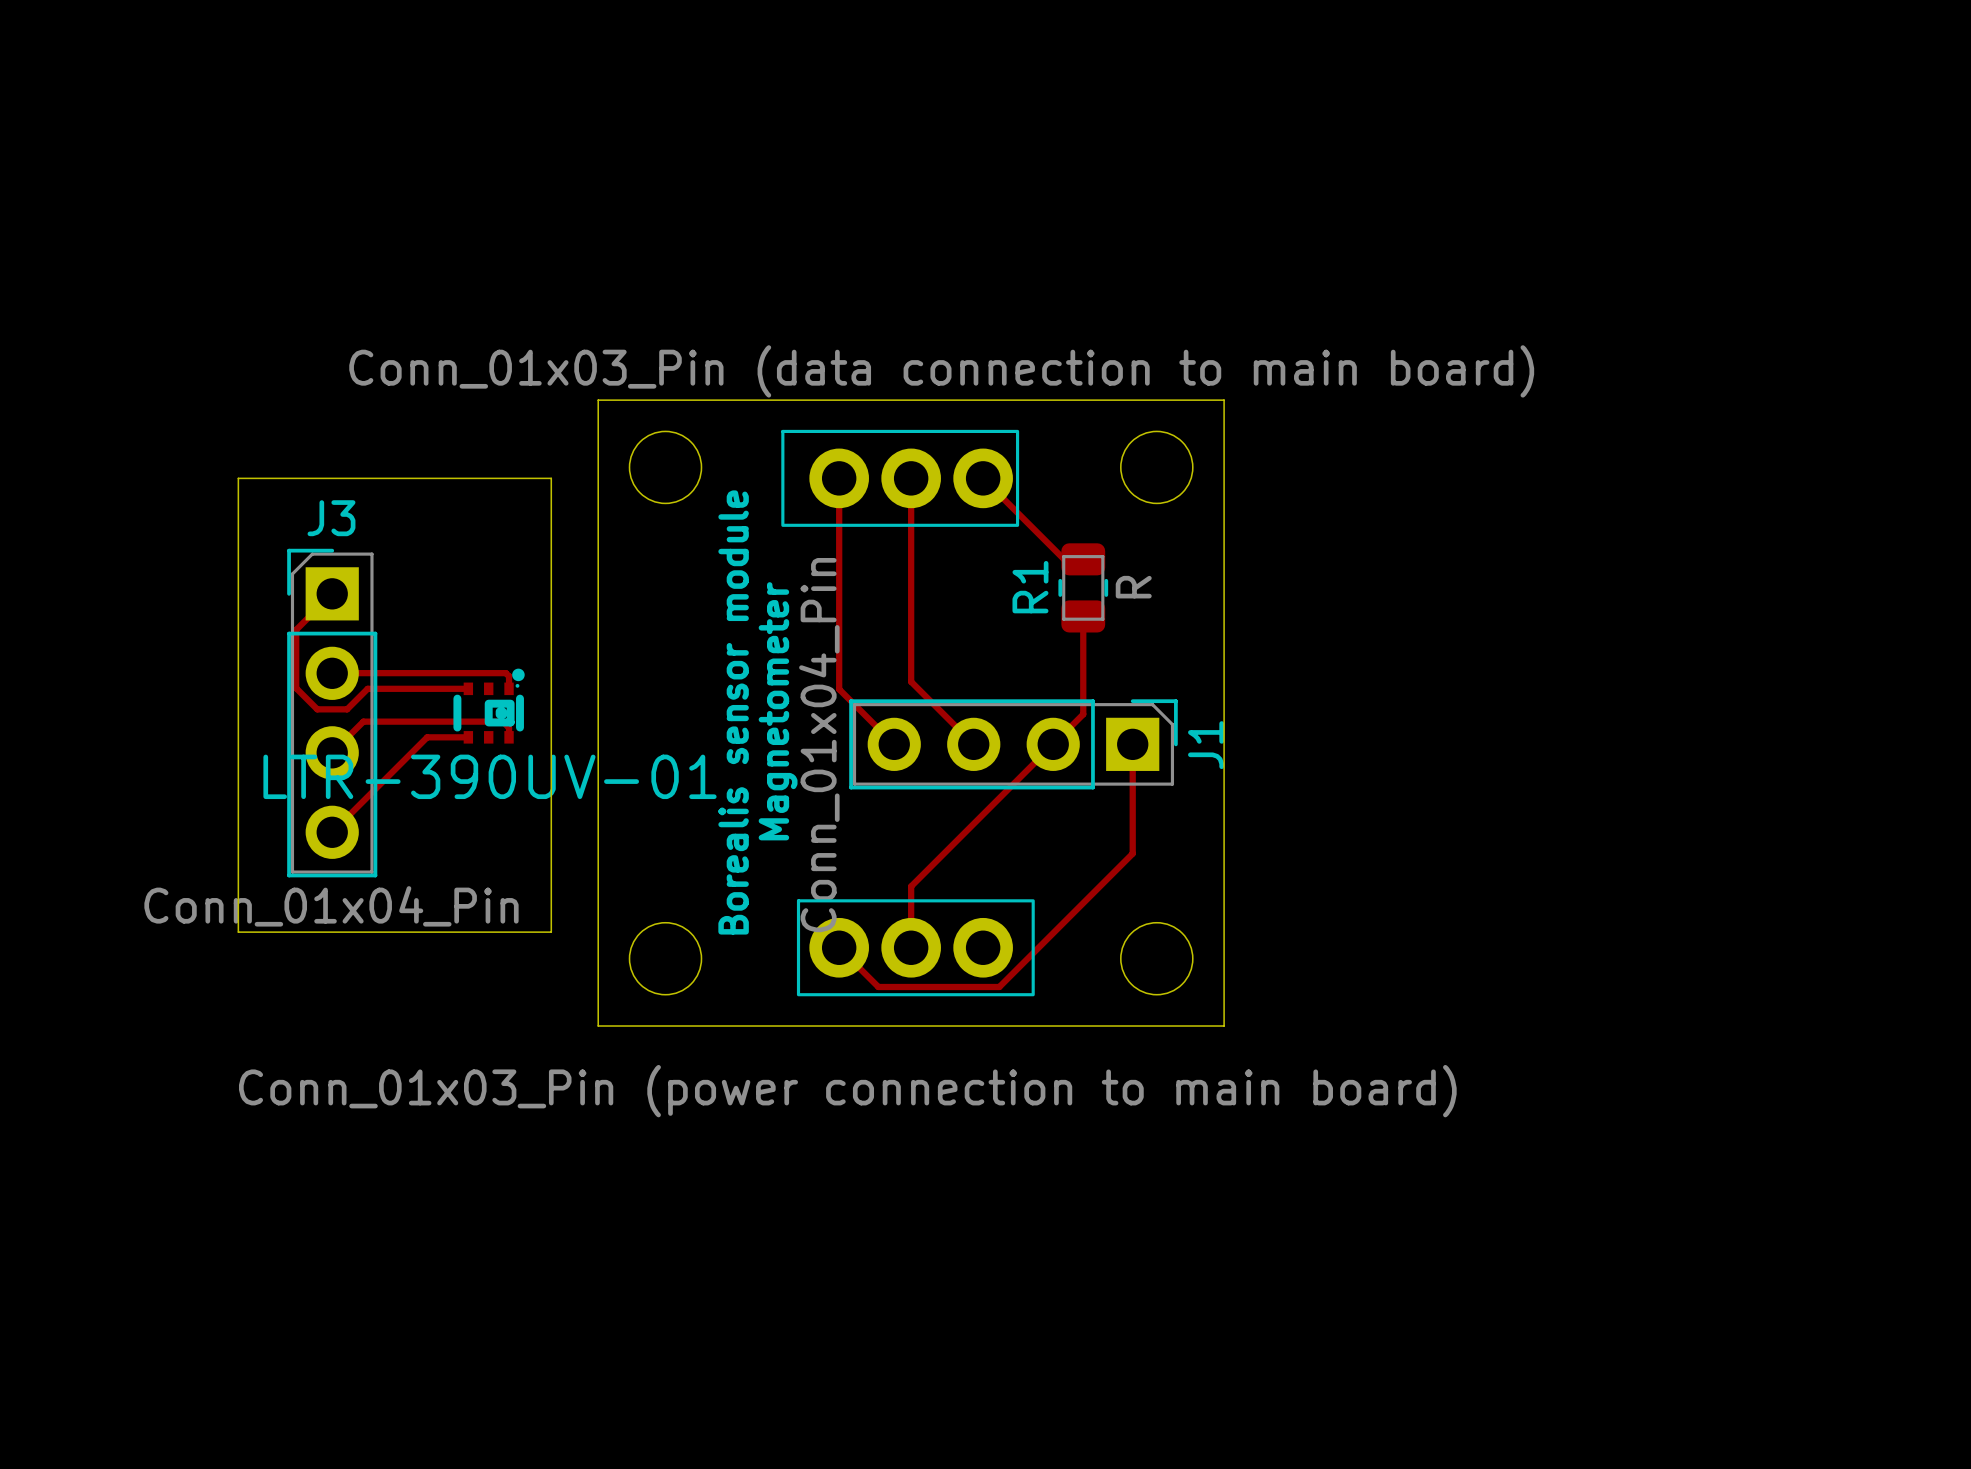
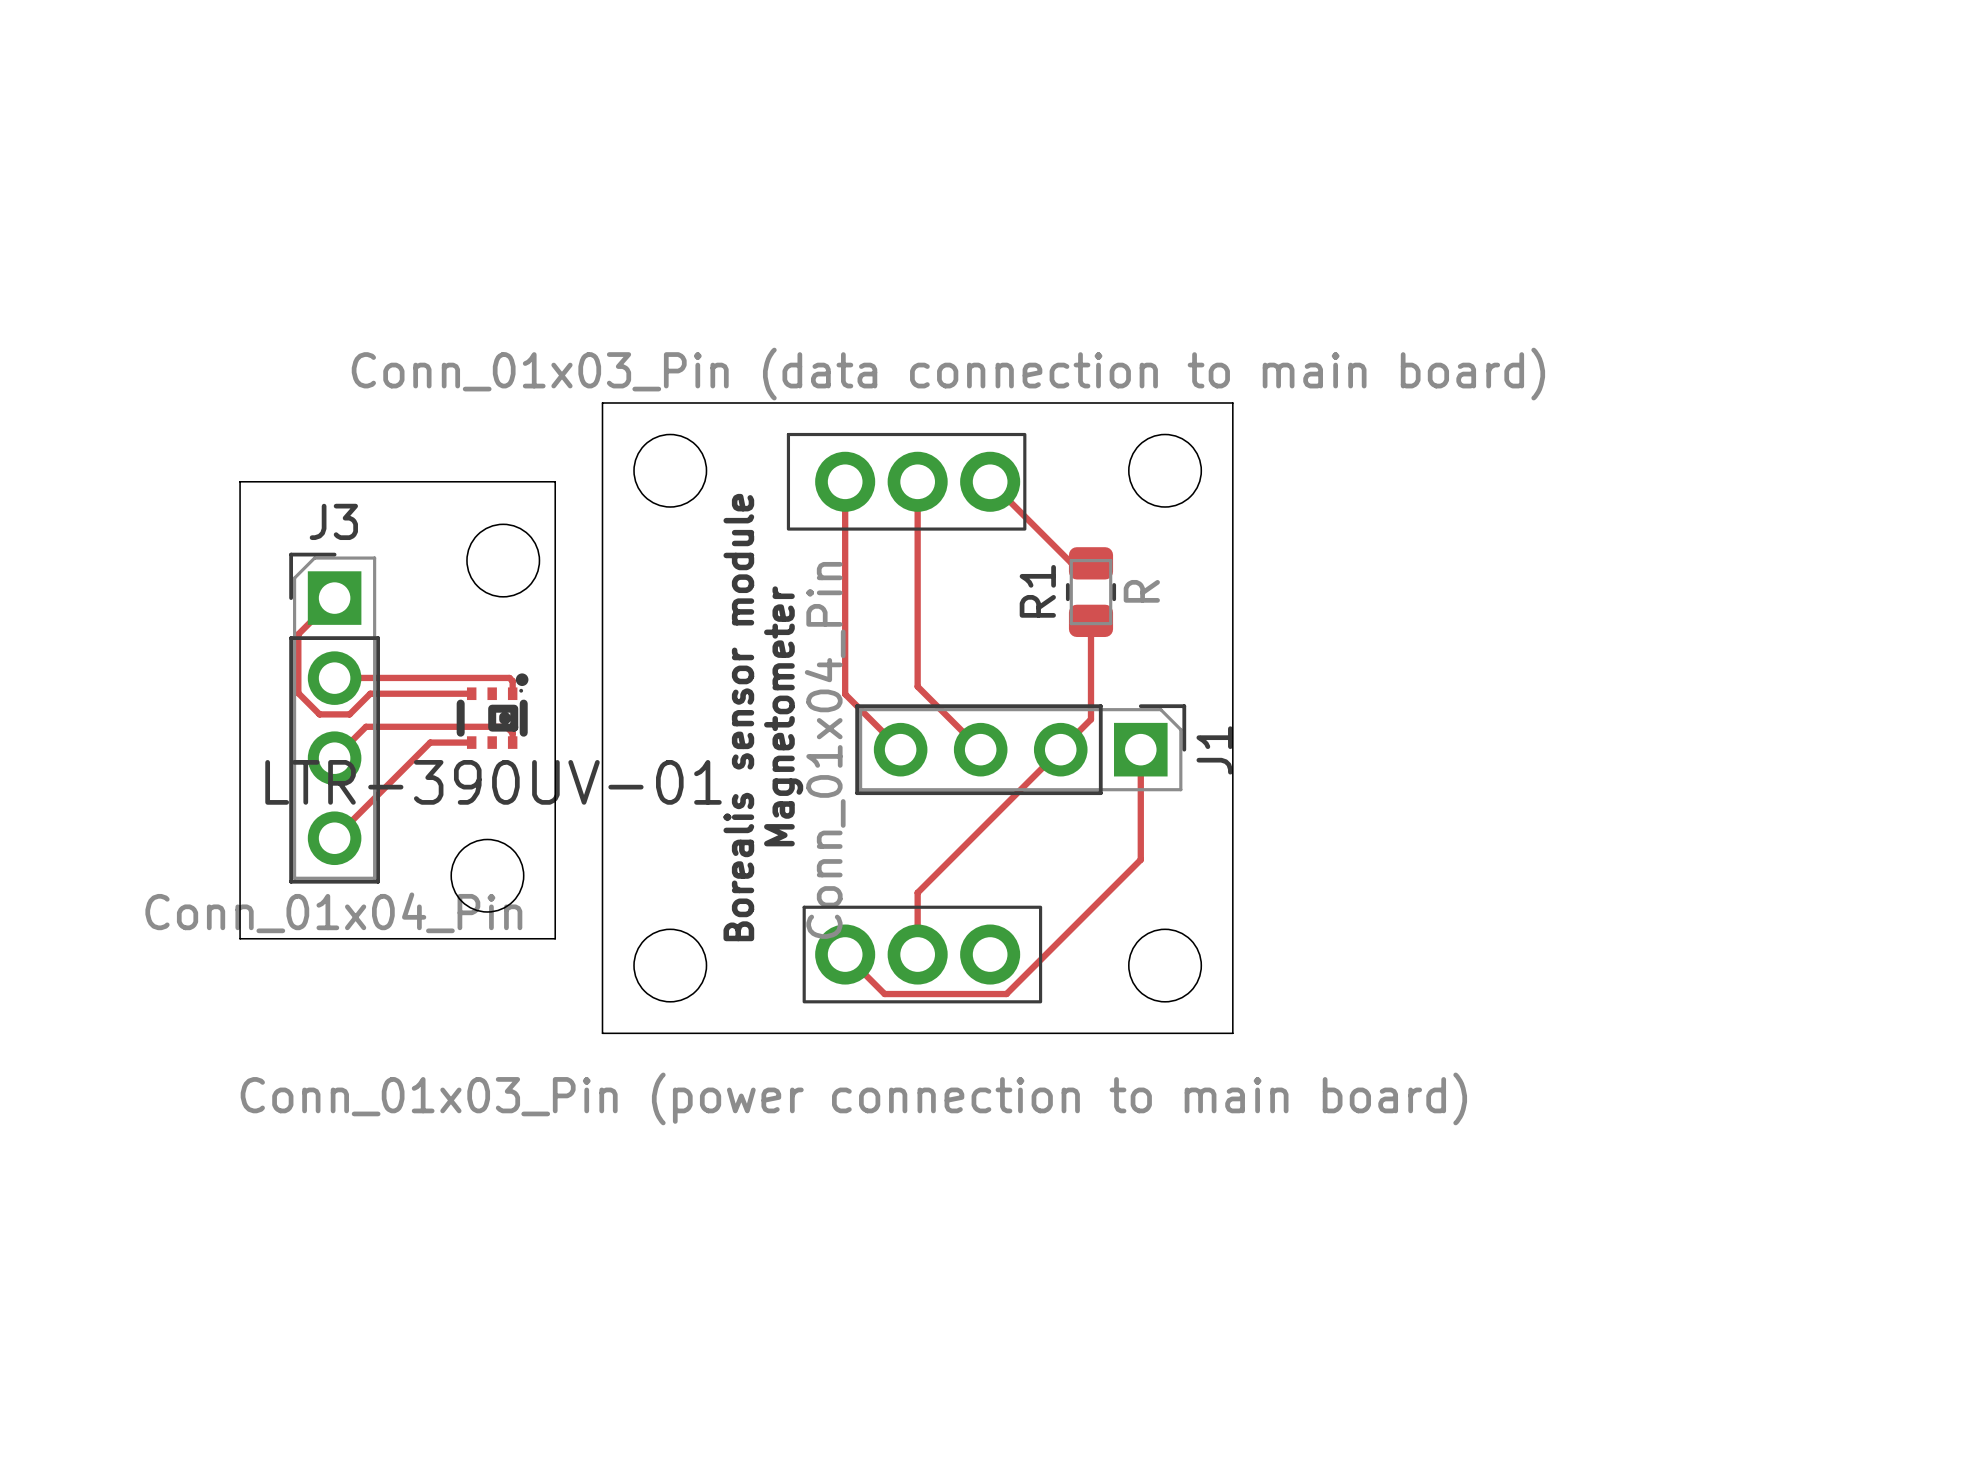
round board edge: none -> [466, 523, 541, 598]
round board edge: none -> [450, 838, 525, 913]

